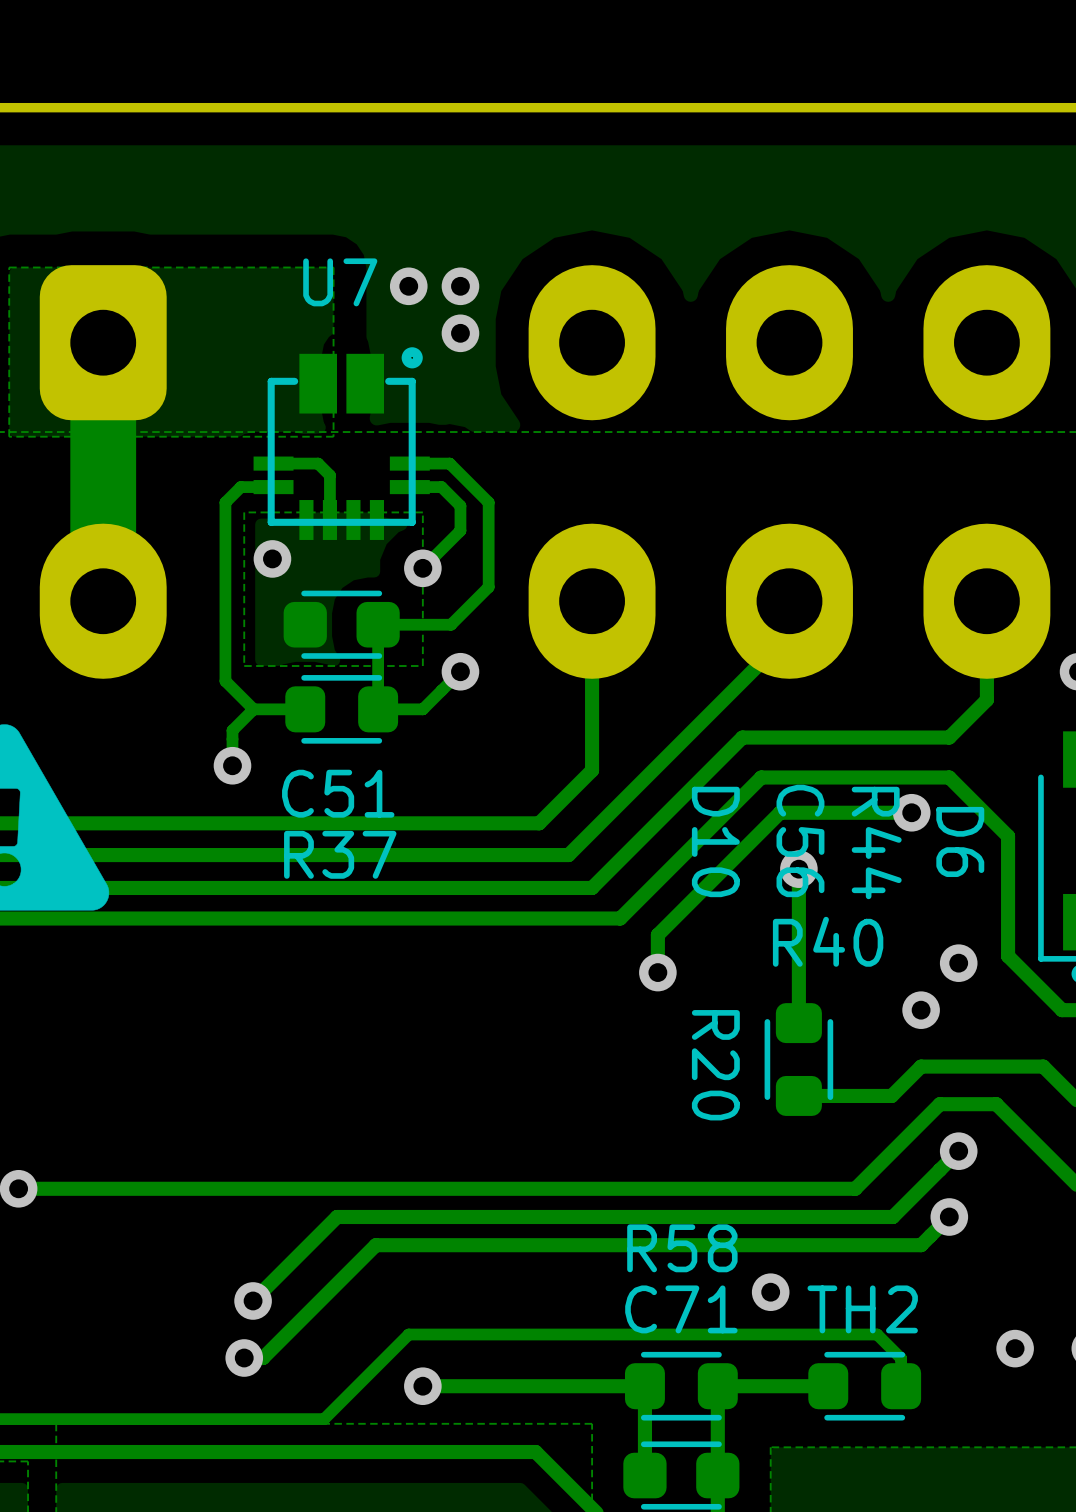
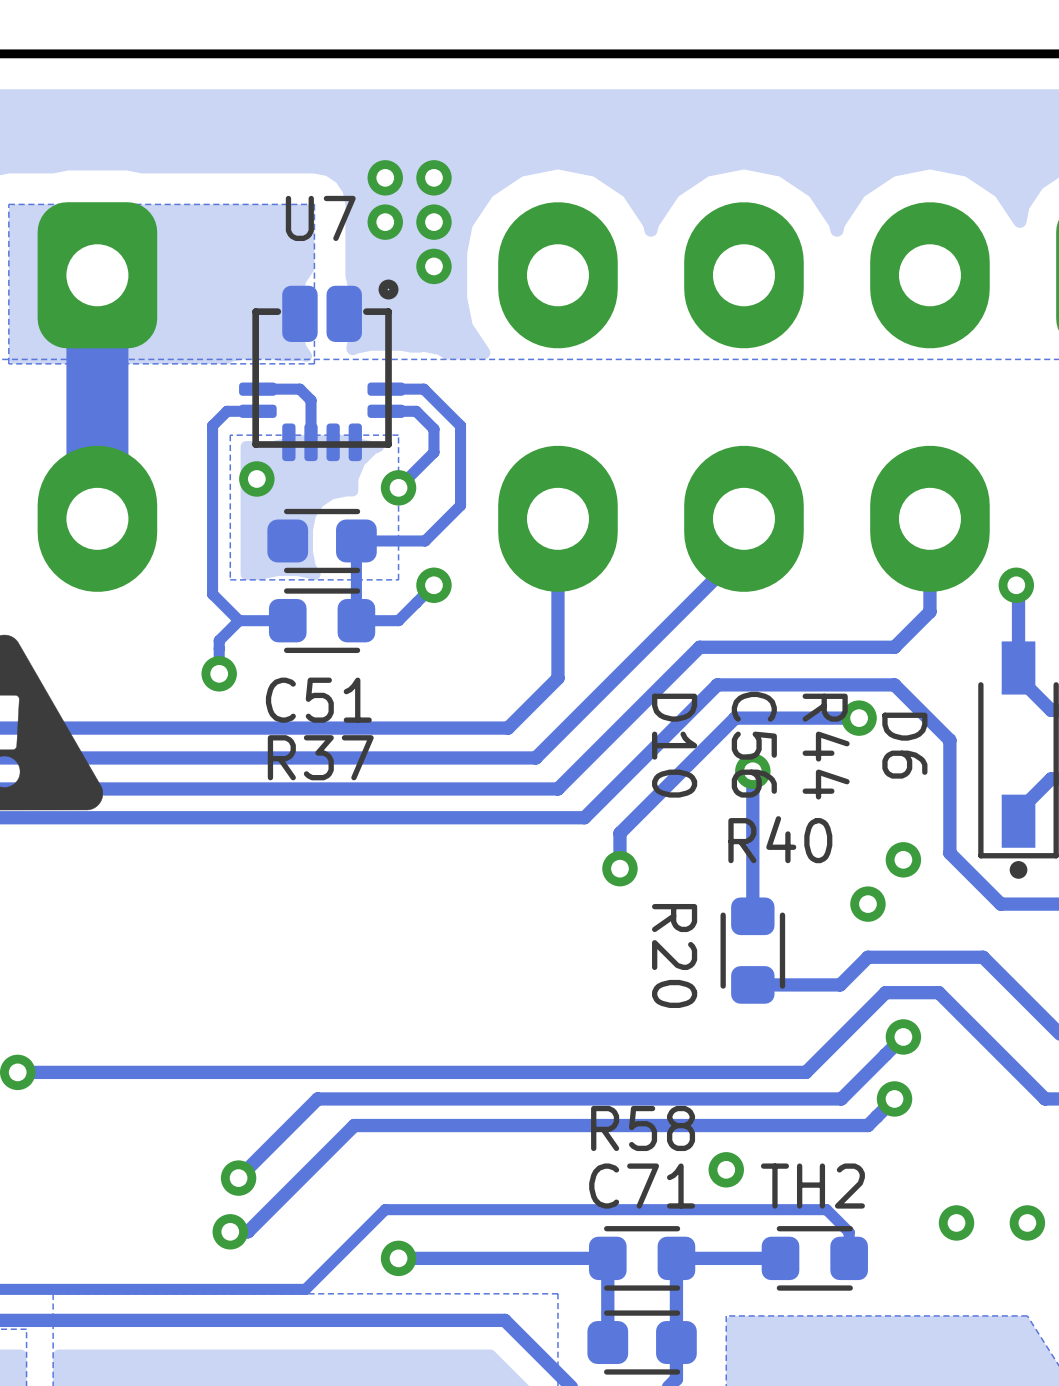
via: none -> (385, 177)
via: none -> (433, 177)
U7 footprint: [253, 347, 430, 540] -> [239, 279, 406, 462]

